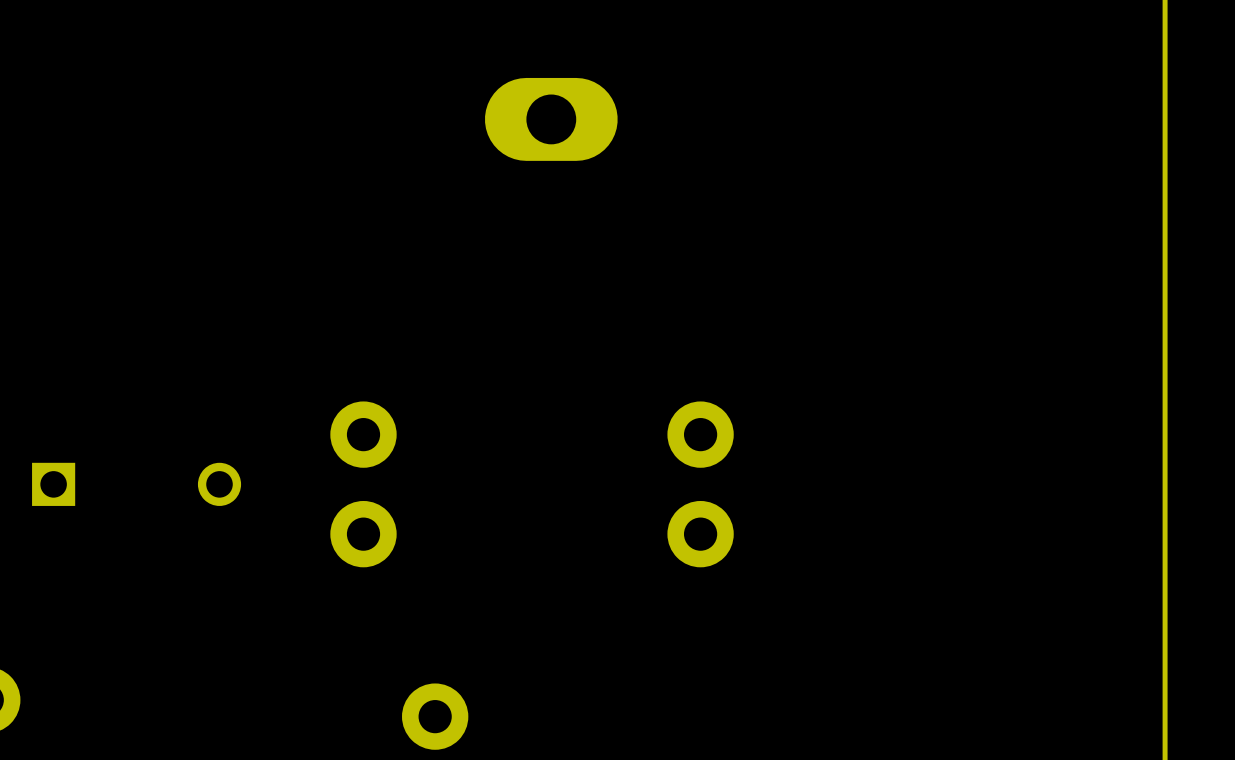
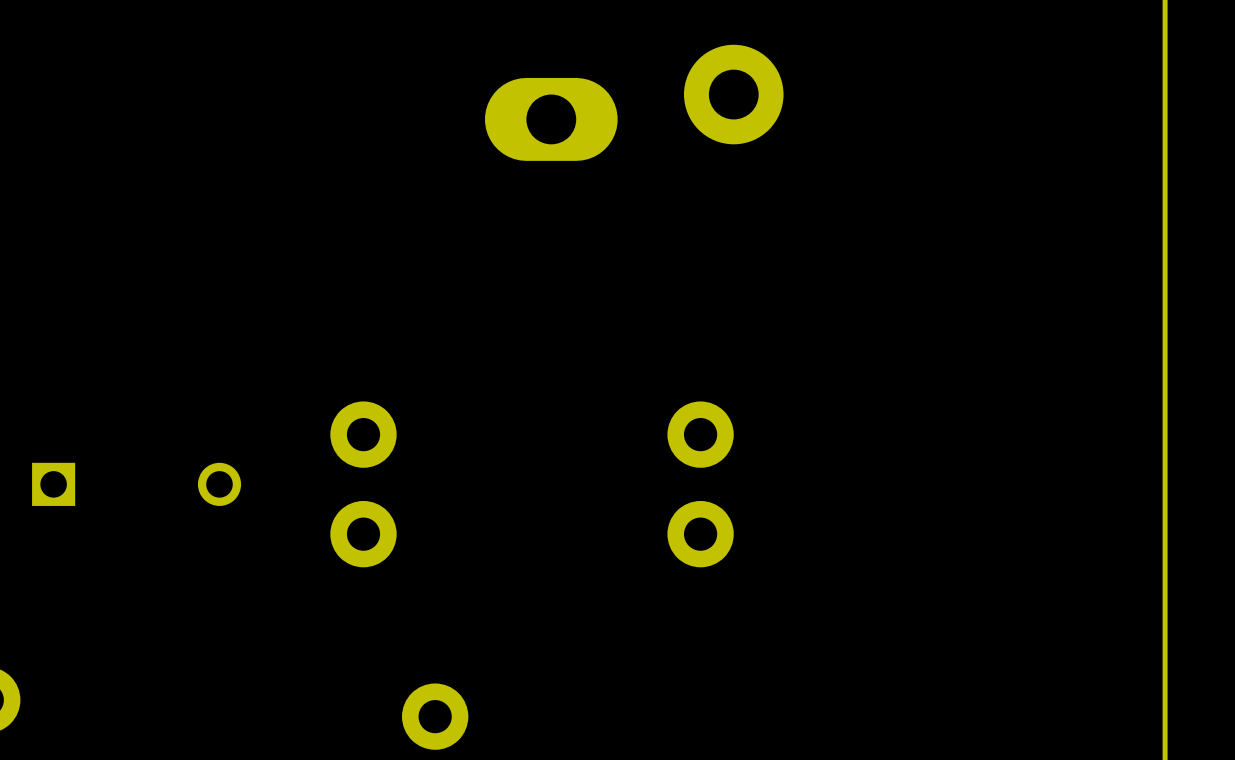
part: none -> (733, 94)

